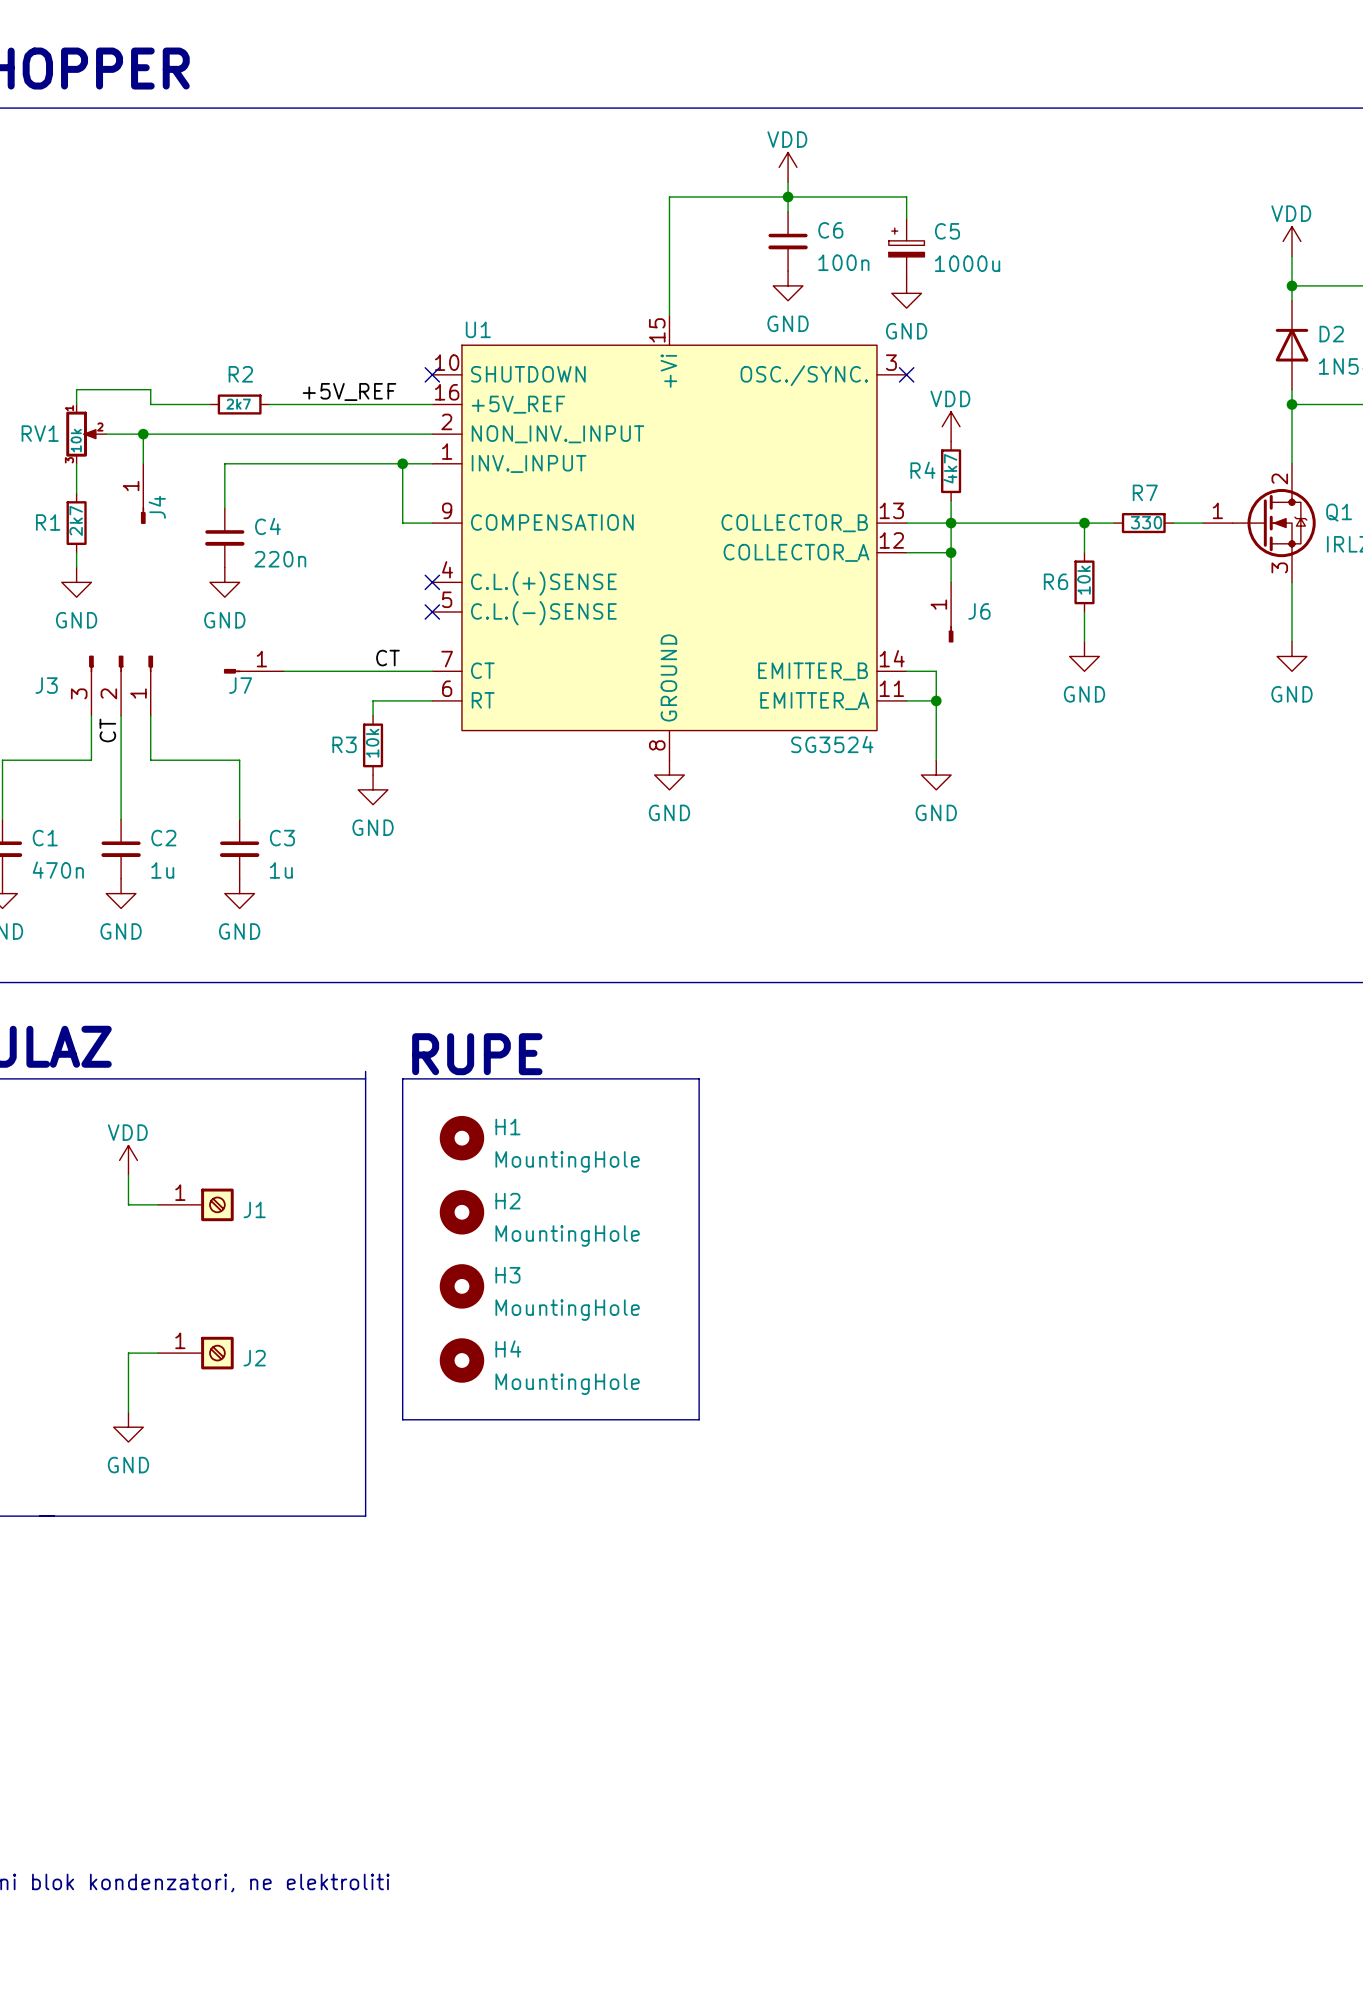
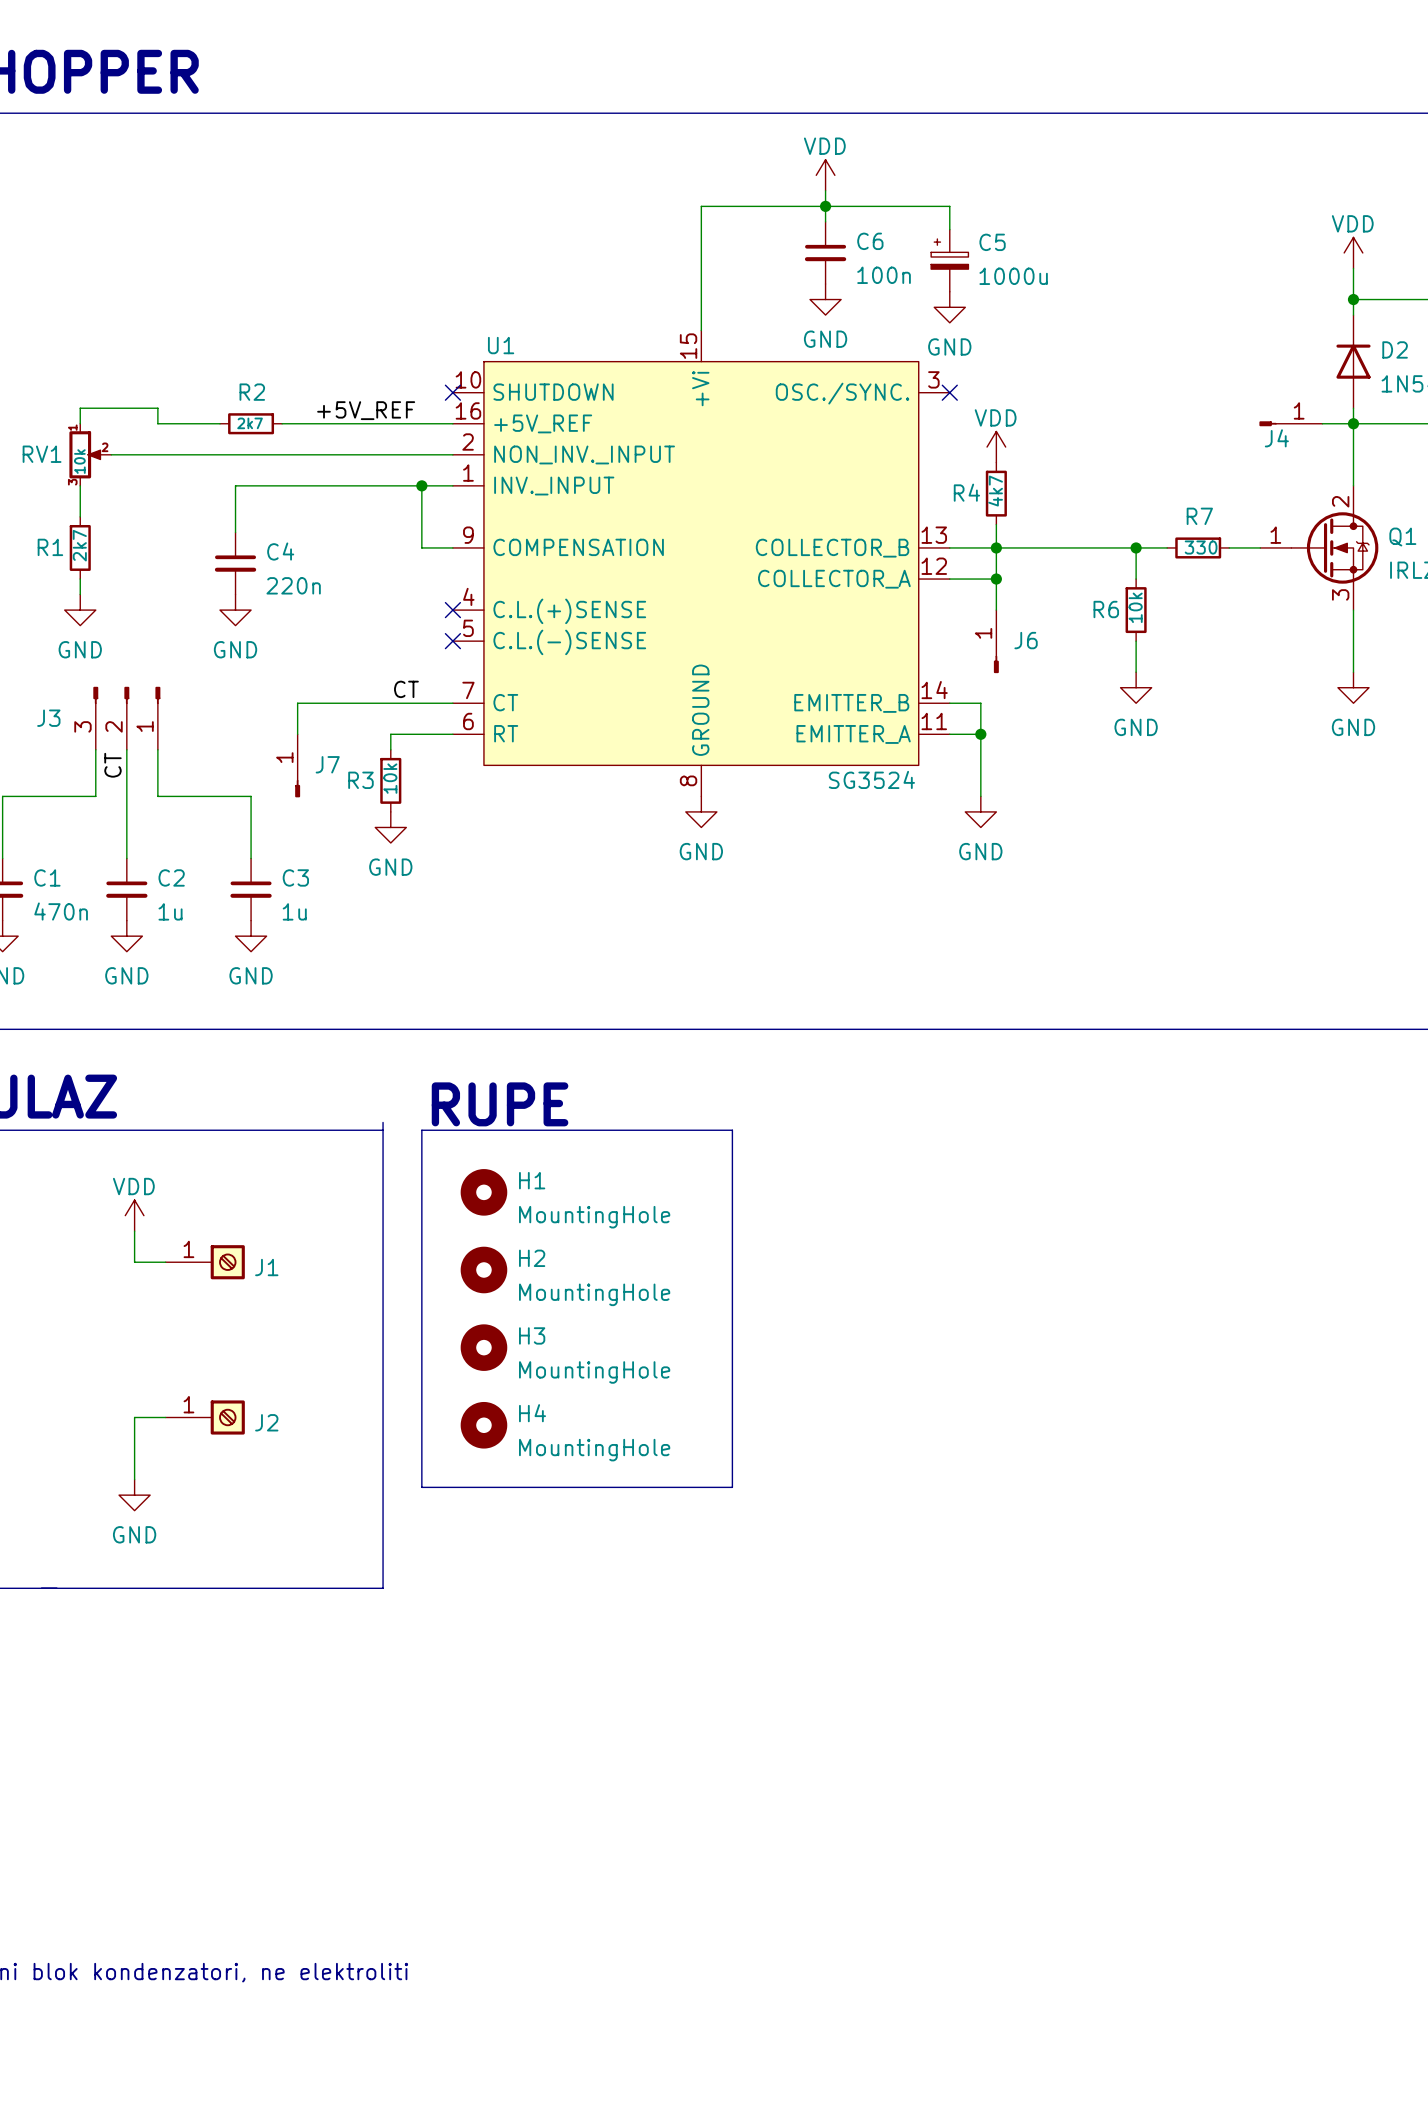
wire: none -> (1322, 423) (1353, 423)
wire: (143, 434) (143, 463) -> (297, 703) (297, 734)
junction: (143, 434) -> none
J4 position: (143, 493) -> (1290, 423)
J4 rotation: 0° (143, 515) -> 90° clockwise (1268, 423)
J7 rotation: 0° (232, 671) -> 90° counterclockwise (297, 788)
J7 position: (254, 671) -> (297, 765)
J7 name position: J7 (240, 685) -> J7 (327, 764)

